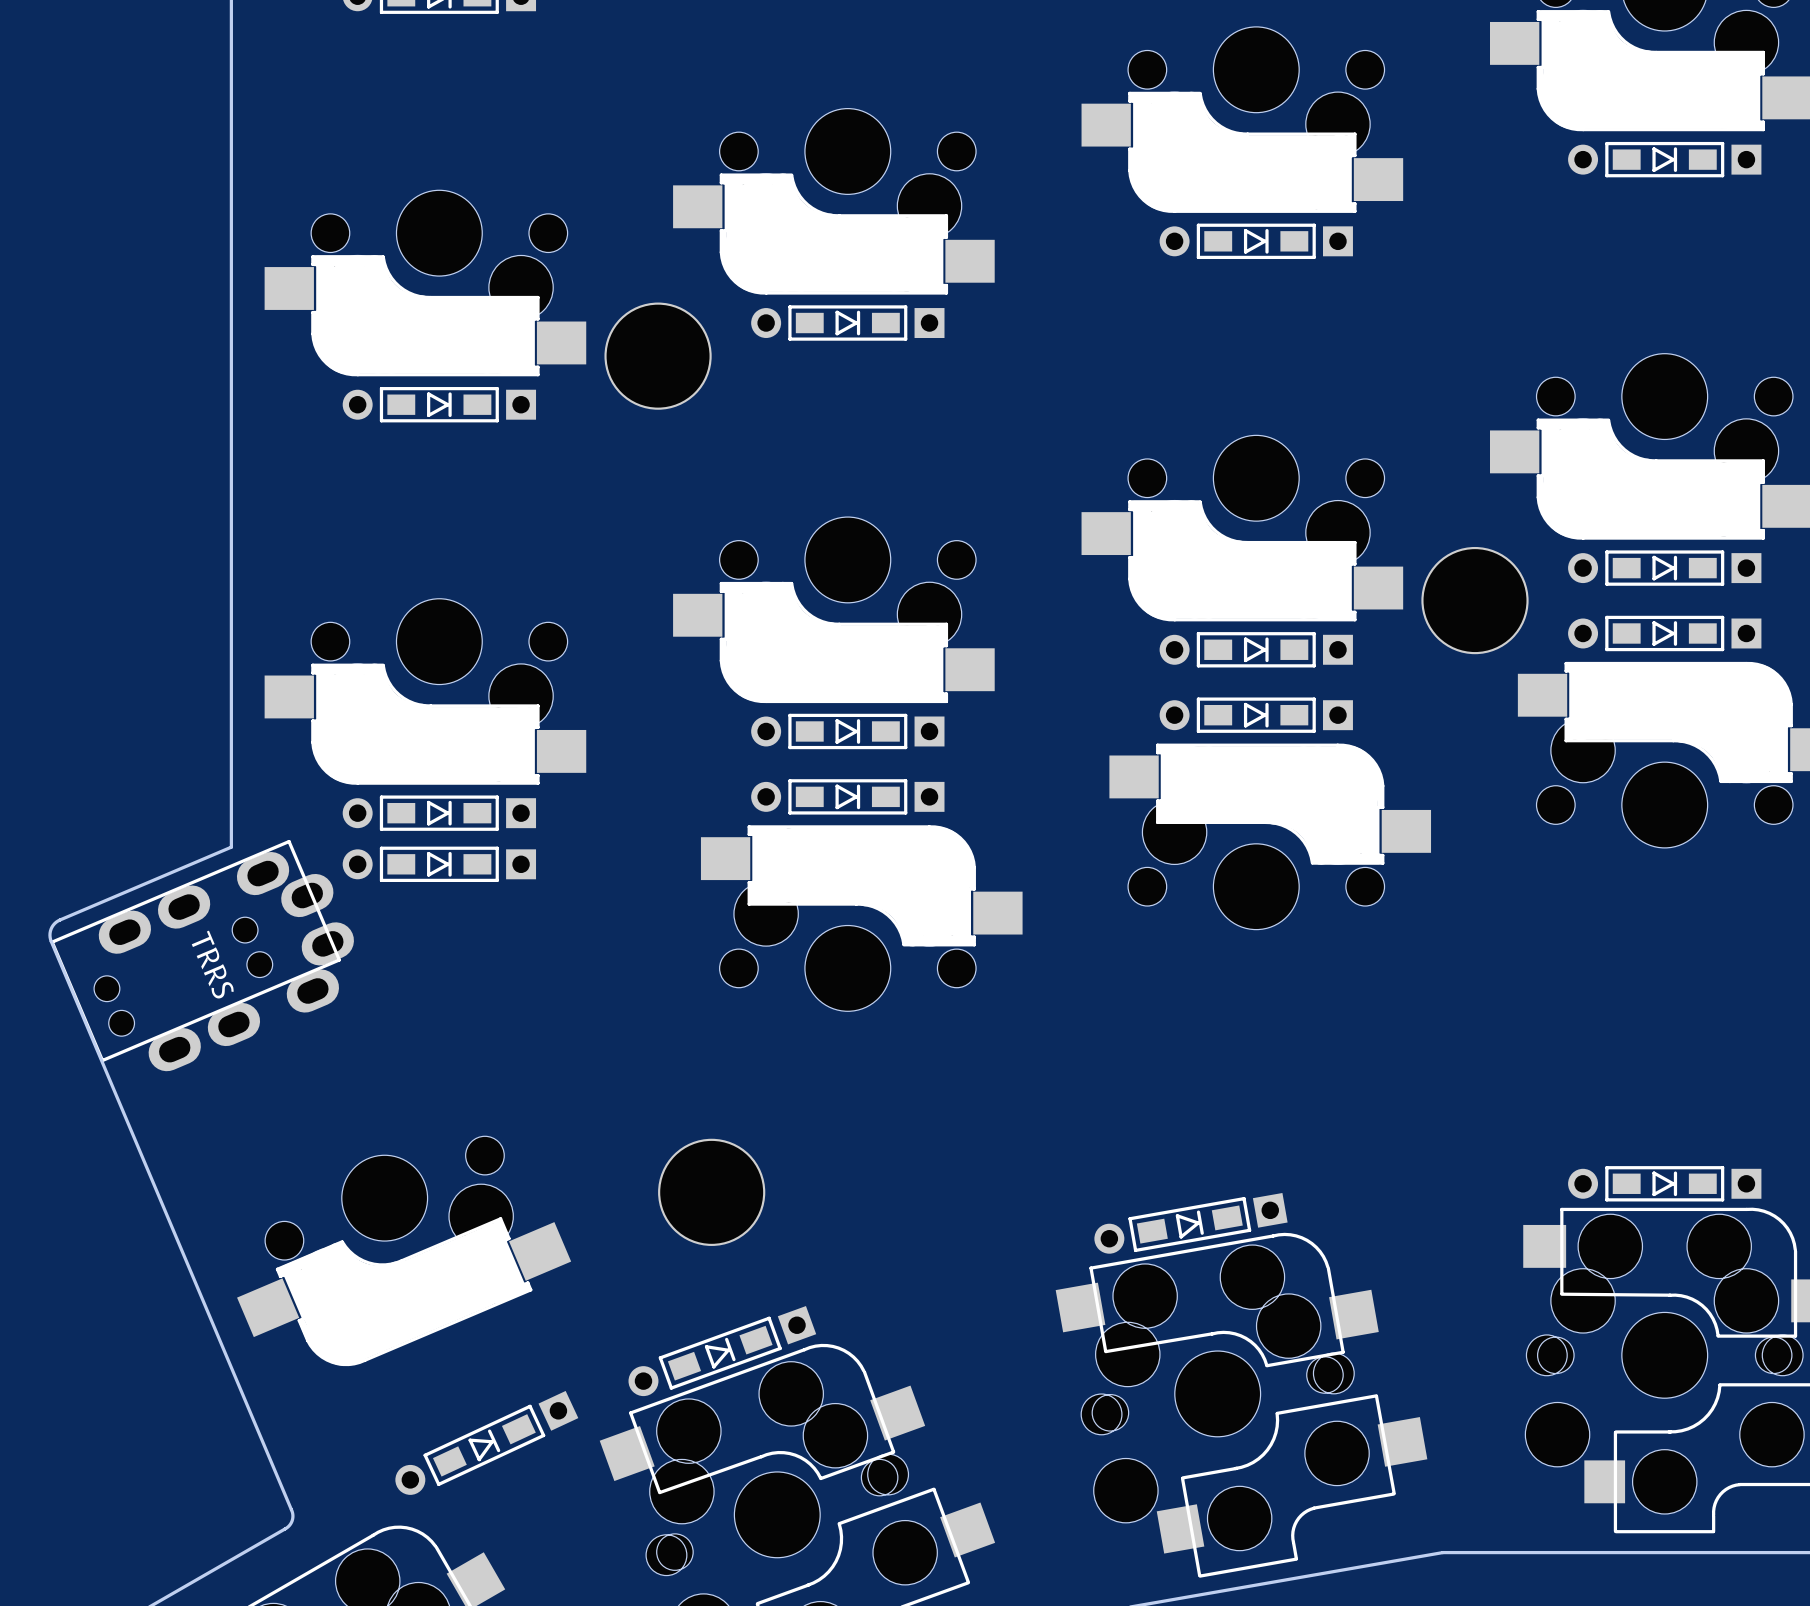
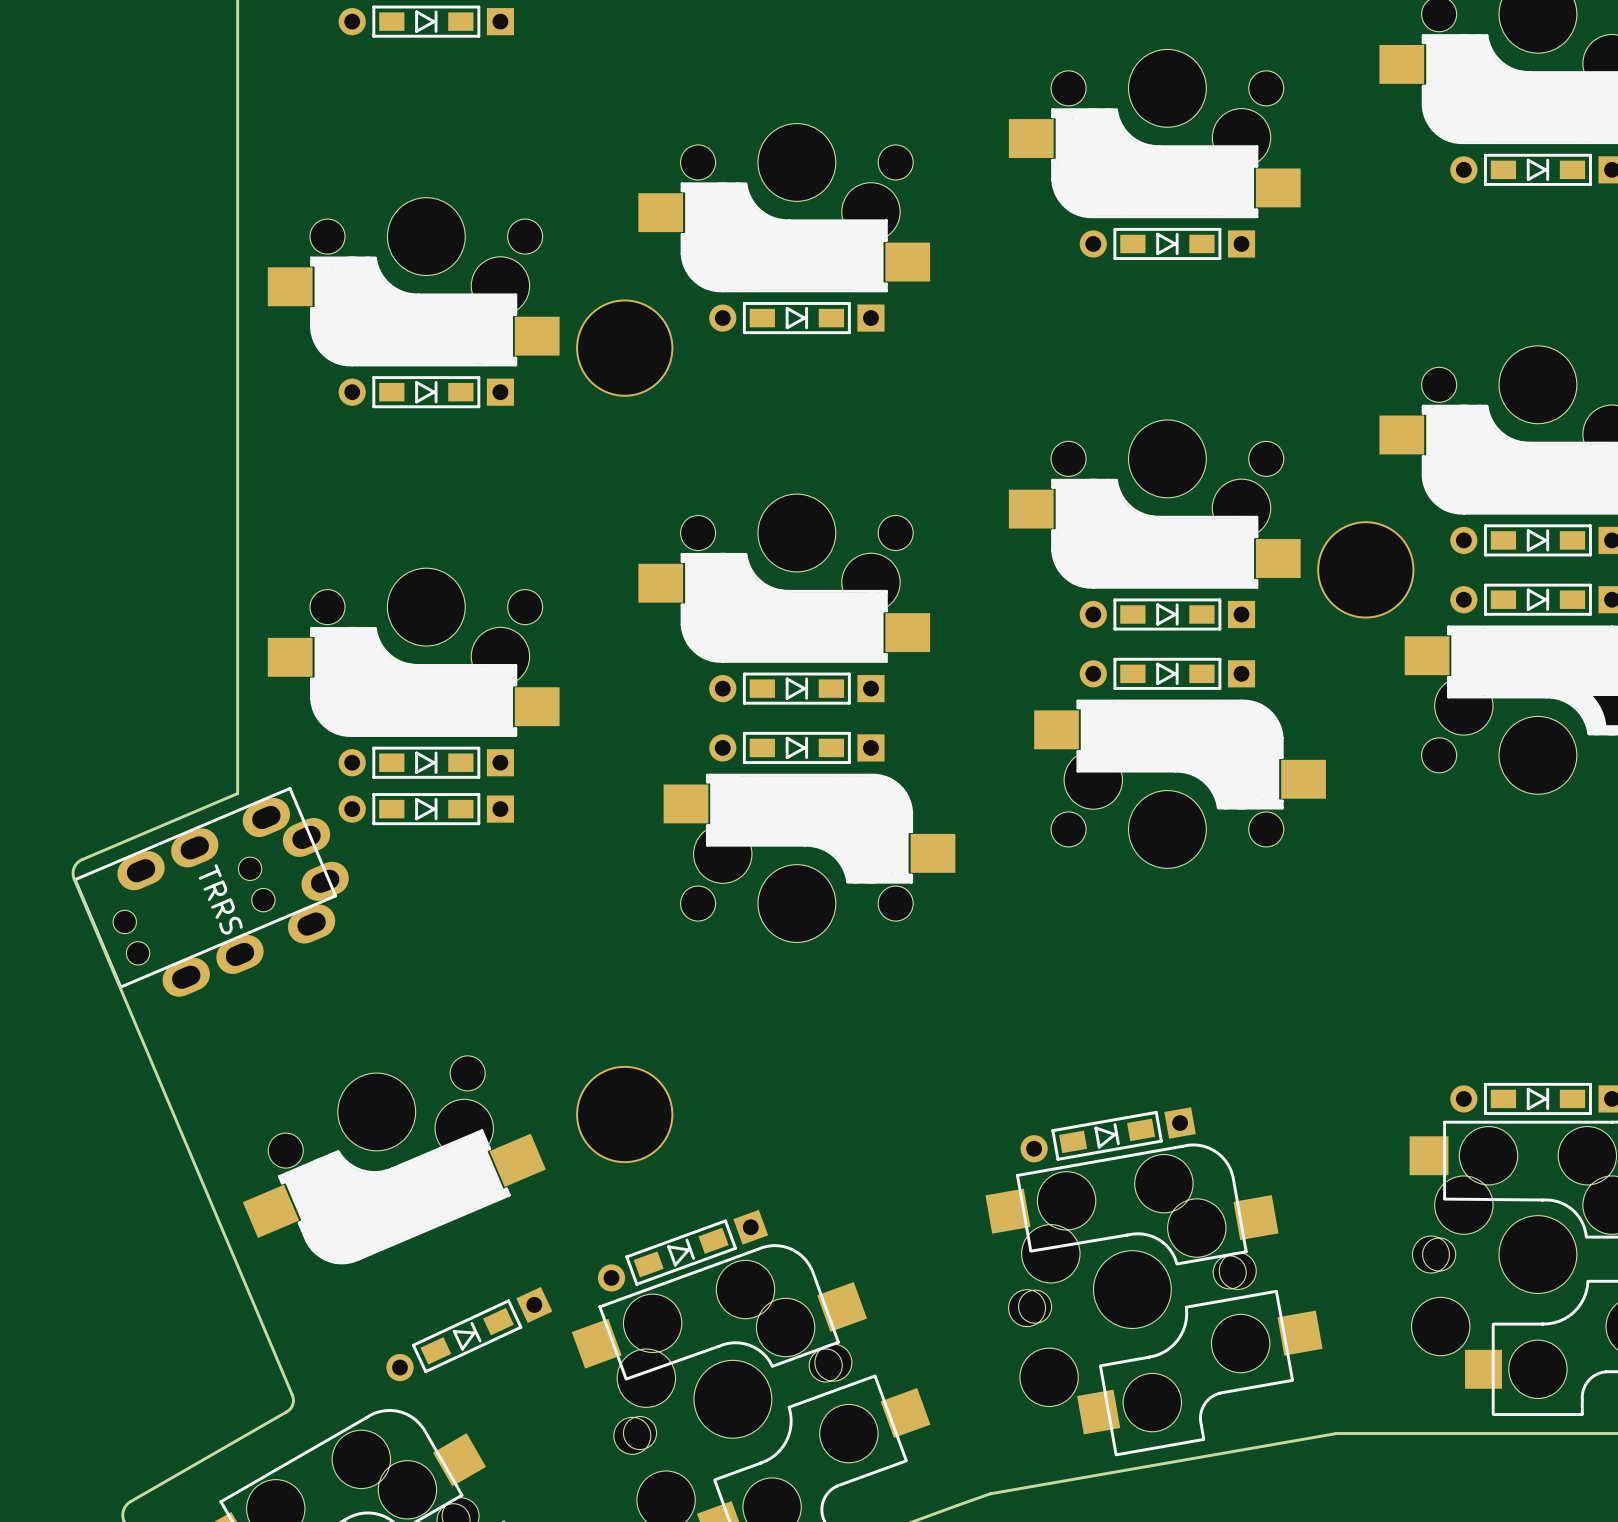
part position: (711, 1192) -> (624, 1114)

